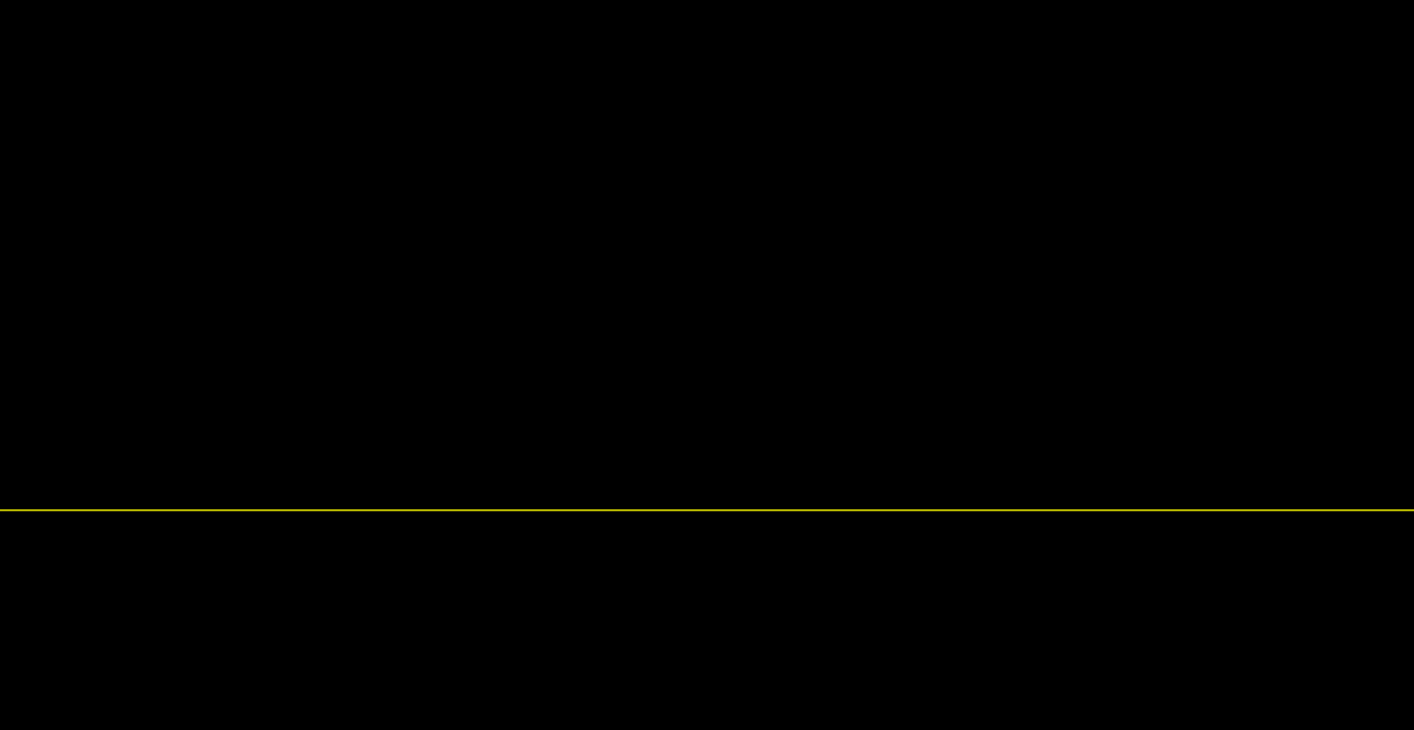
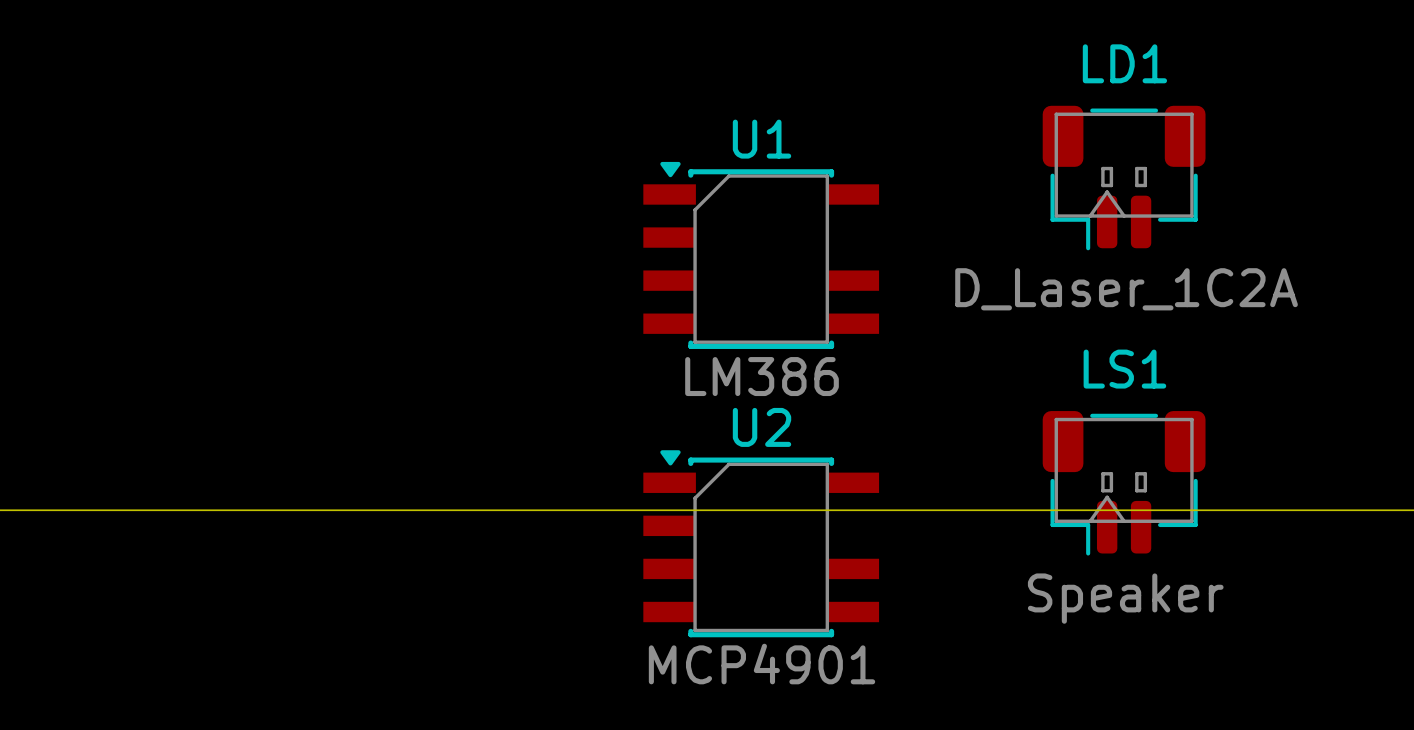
LD1: none -> D_Laser_1C2A (1124, 178)
U1: none -> LM386 (761, 255)
LS1: none -> Speaker (1124, 483)
U2: none -> MCP4901 (761, 543)

